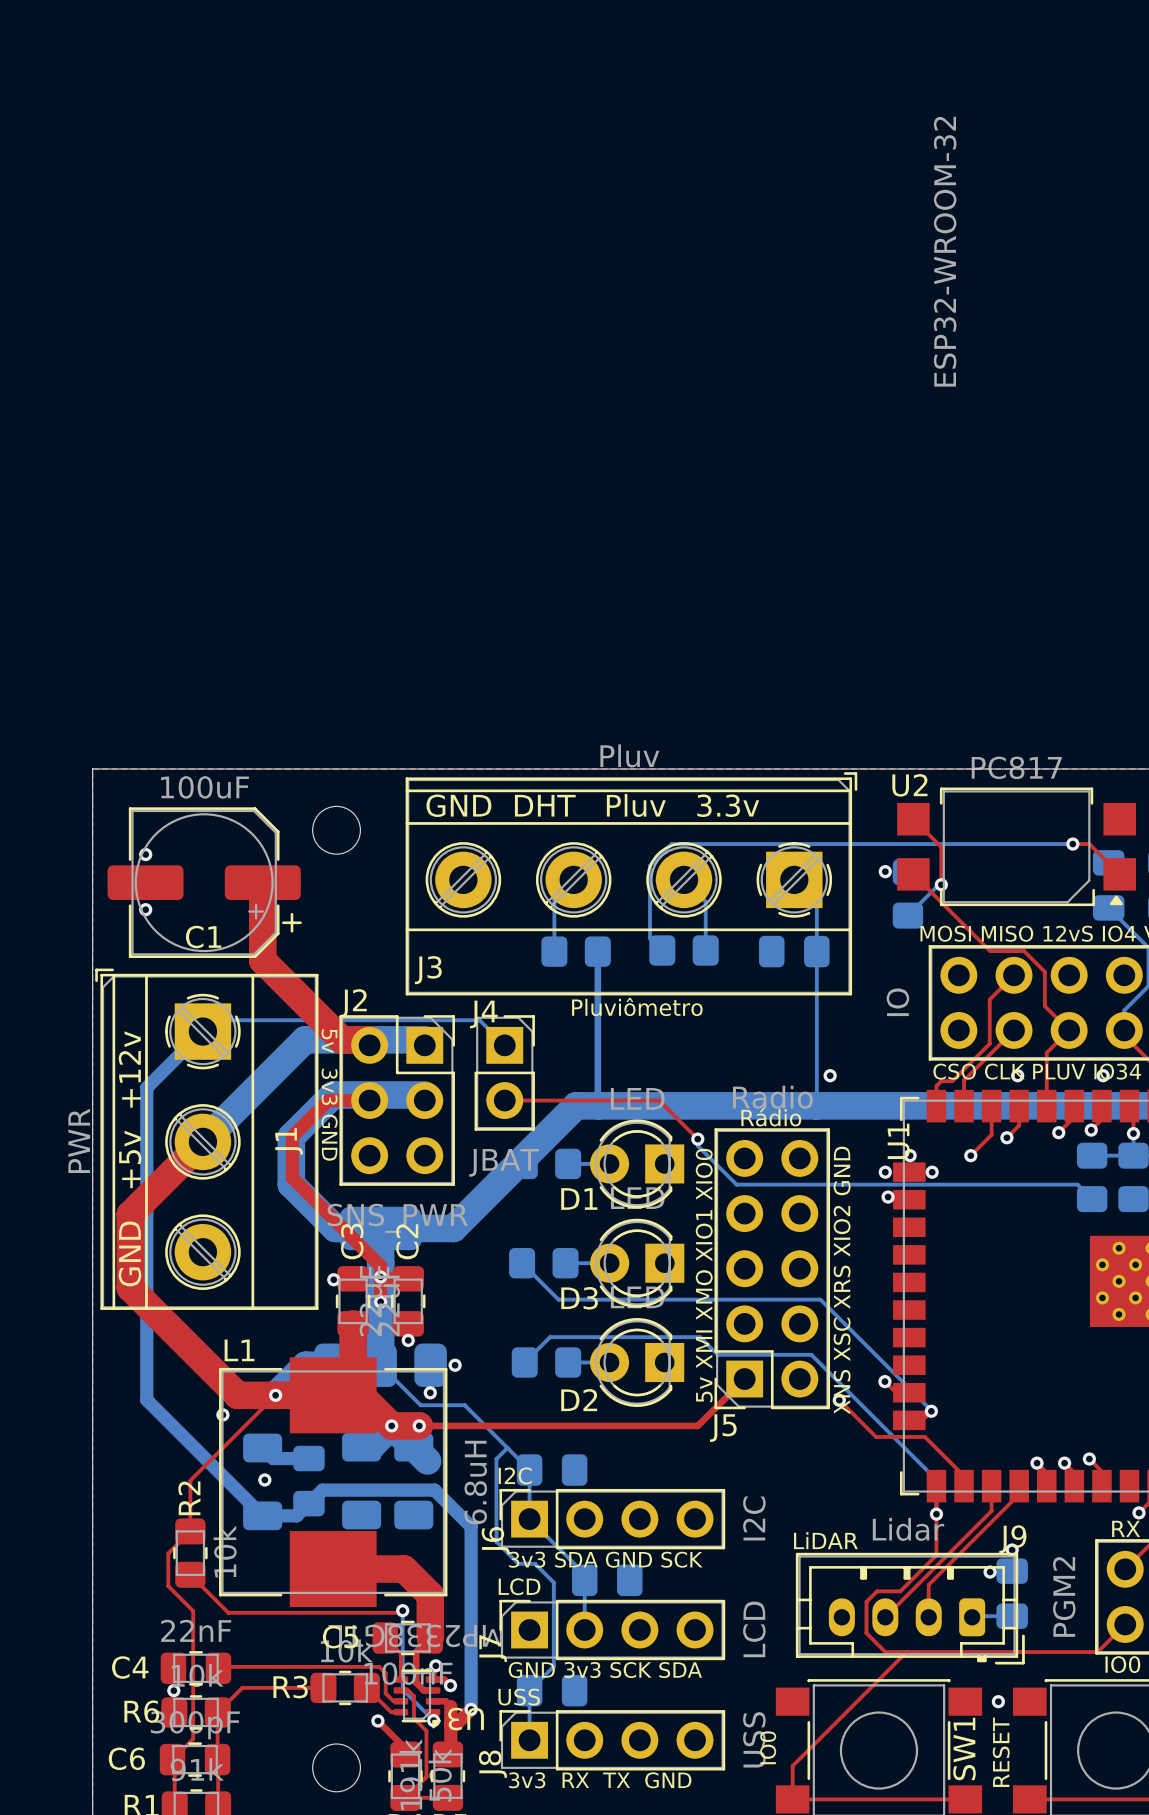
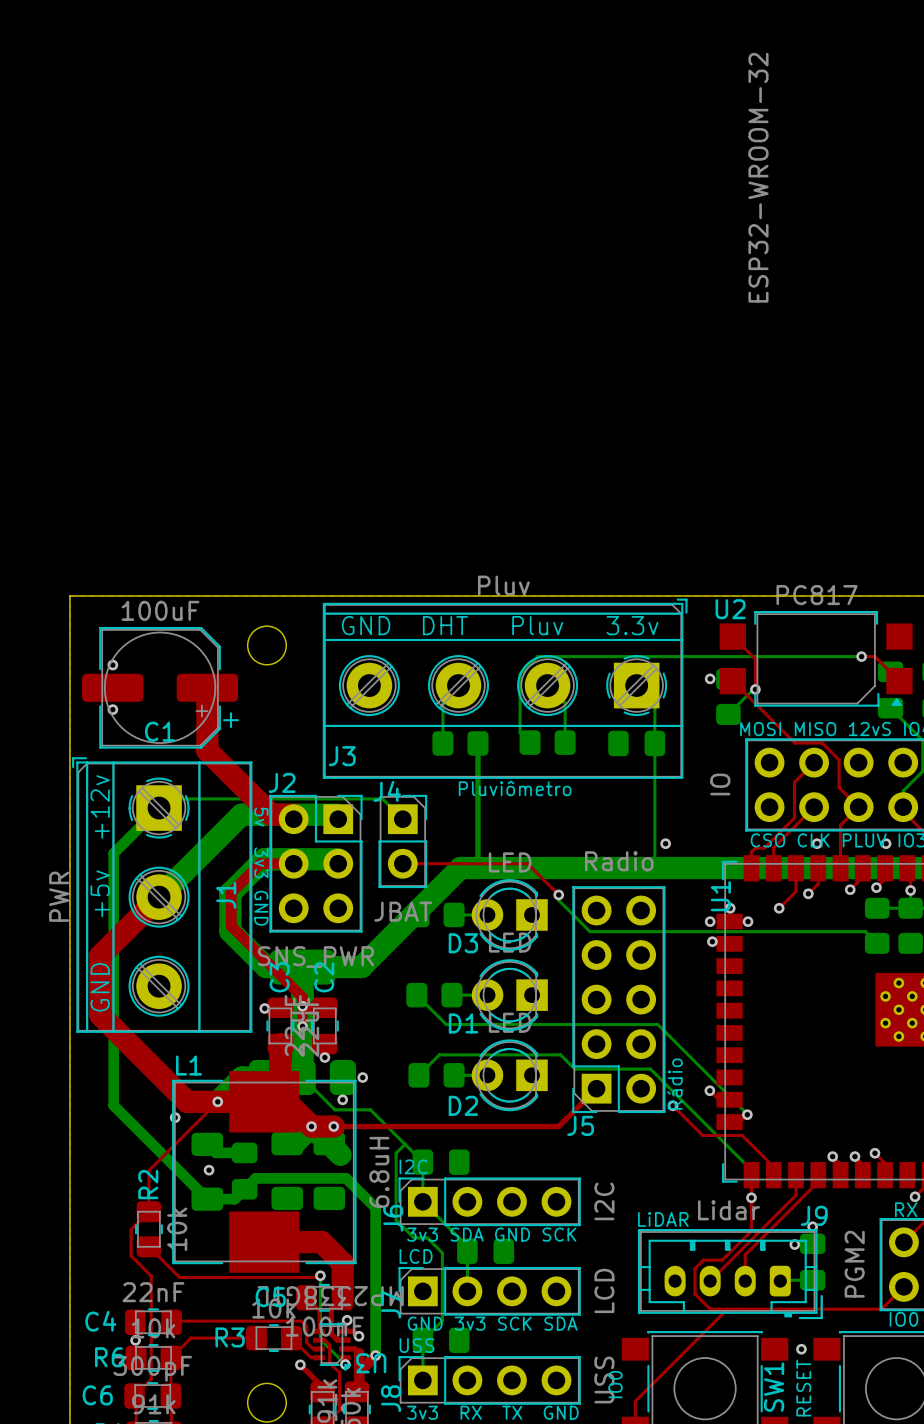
text rotation: 0° (771, 1117) -> 90° counterclockwise (674, 1084)
text position: Rádio (771, 1117) -> Rádio (674, 1084)
D1 name: D1 (579, 1198) -> D3 (463, 943)
text: 5v XMI XMO XIO1 XIO0 (704, 1275) -> none
text: XNS XSC XRS XIO2 GND (842, 1280) -> none
D3 name: D3 (579, 1298) -> D1 (463, 1023)

